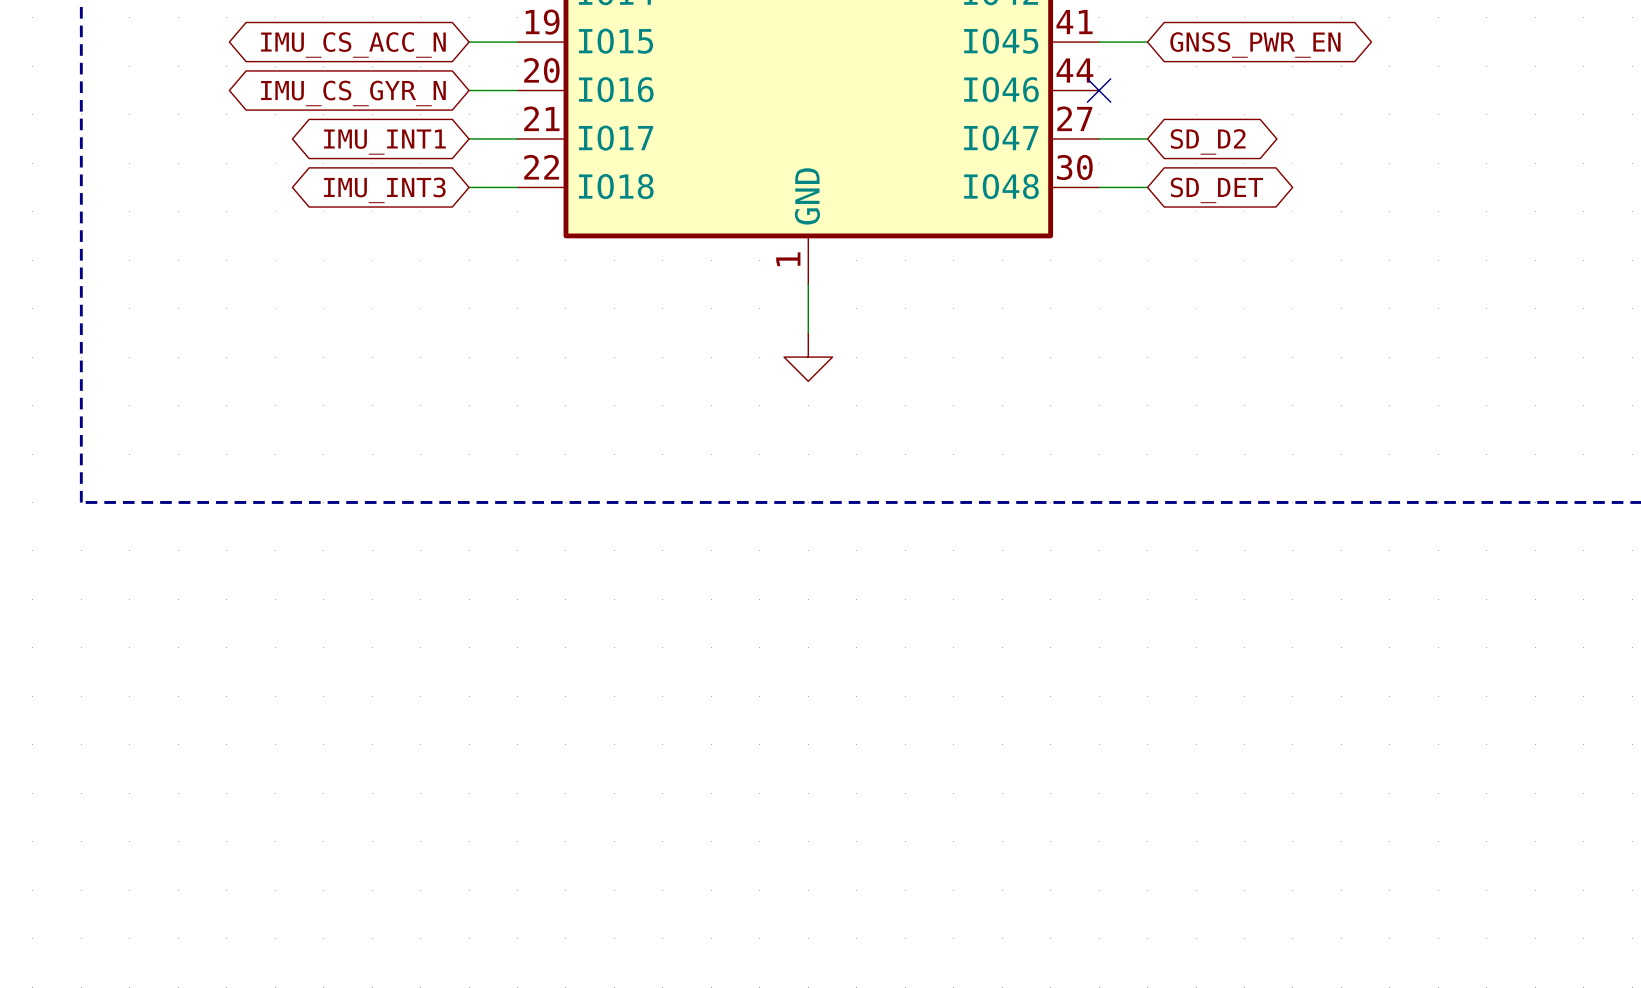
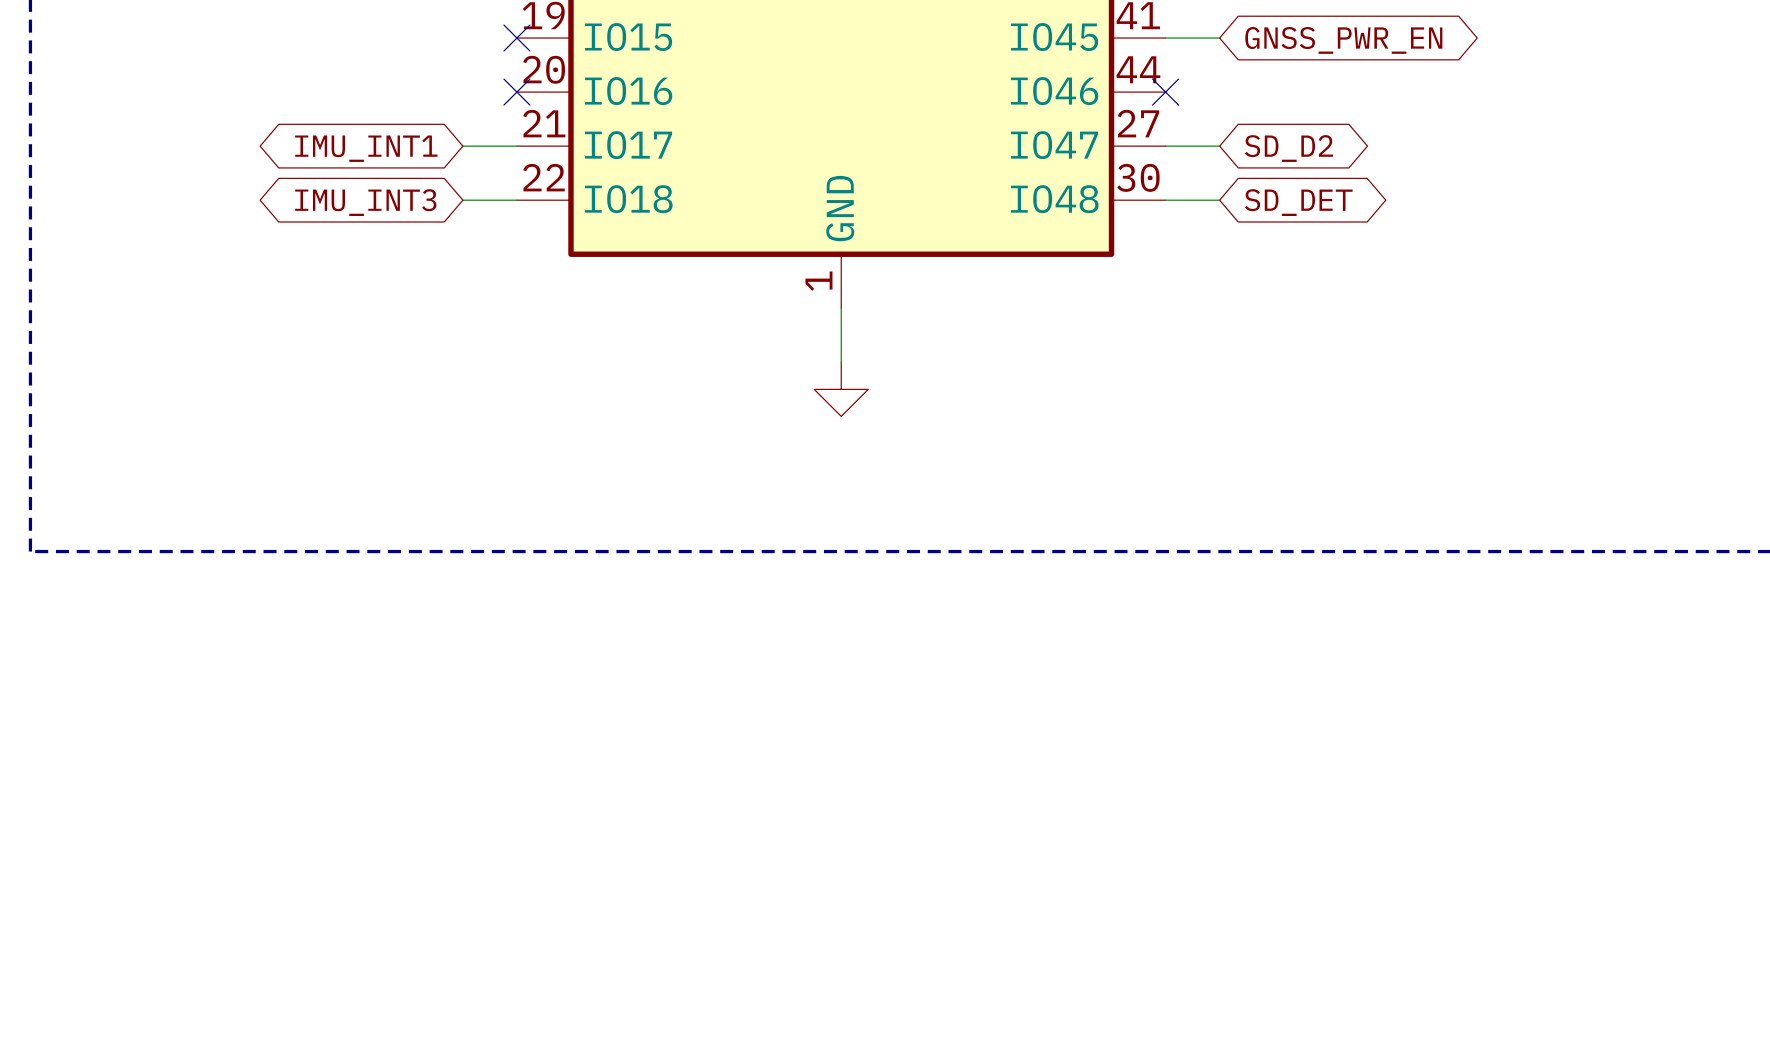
wire: (469, 42) (517, 42) -> none
no-connect mark: none -> (516, 38)
global label: IMU_CS_ACC_N (353, 44) -> none
wire: (469, 90) (517, 90) -> none
no-connect mark: none -> (516, 92)
global label: IMU_CS_GYR_N (353, 93) -> none

